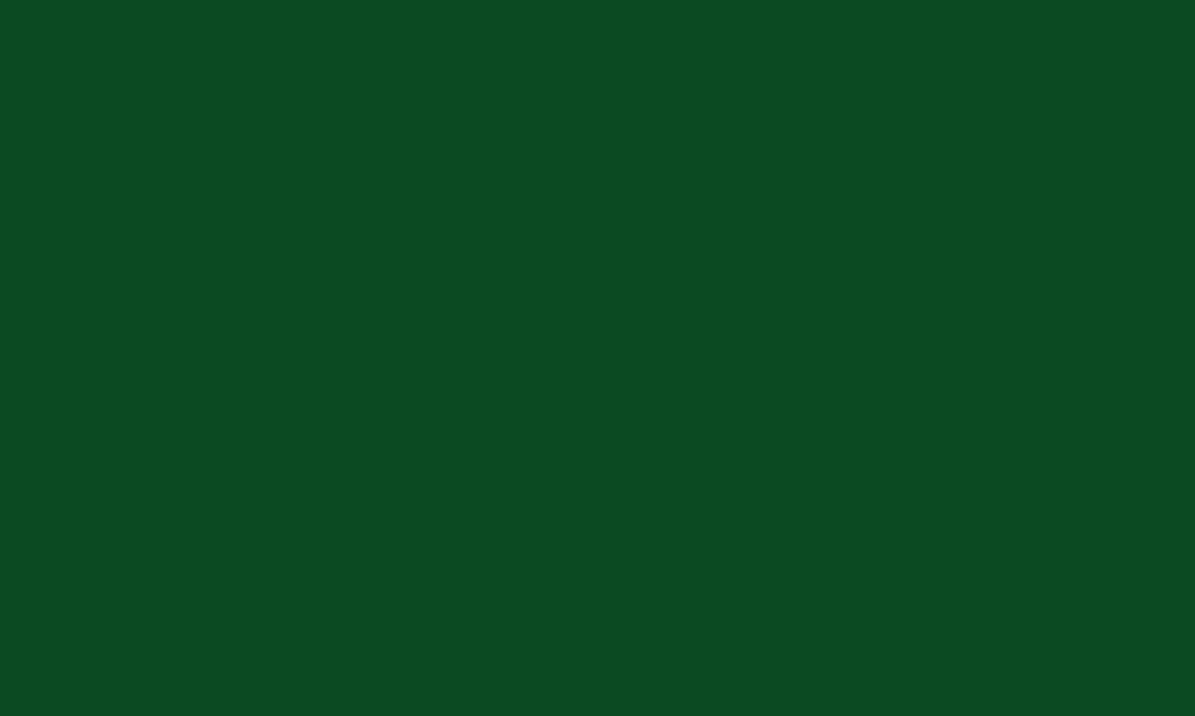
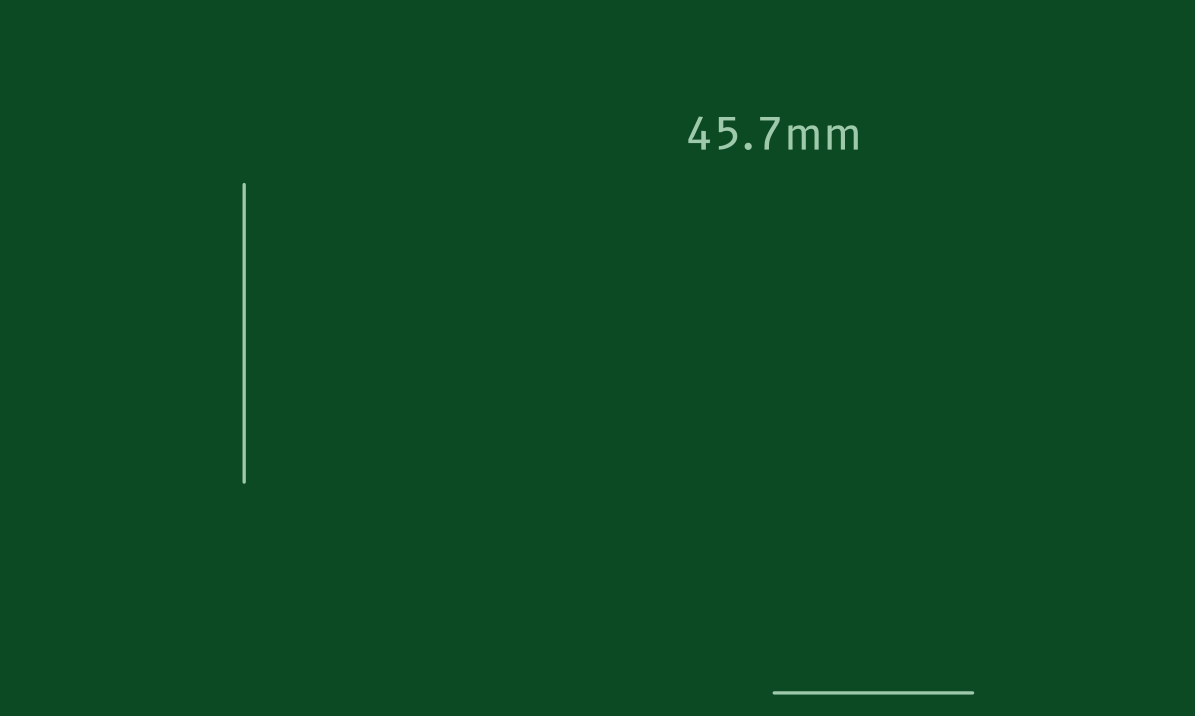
text: none -> 45.7mm (773, 133)
line: none -> (244, 184) (244, 482)
line: none -> (774, 692) (972, 692)

